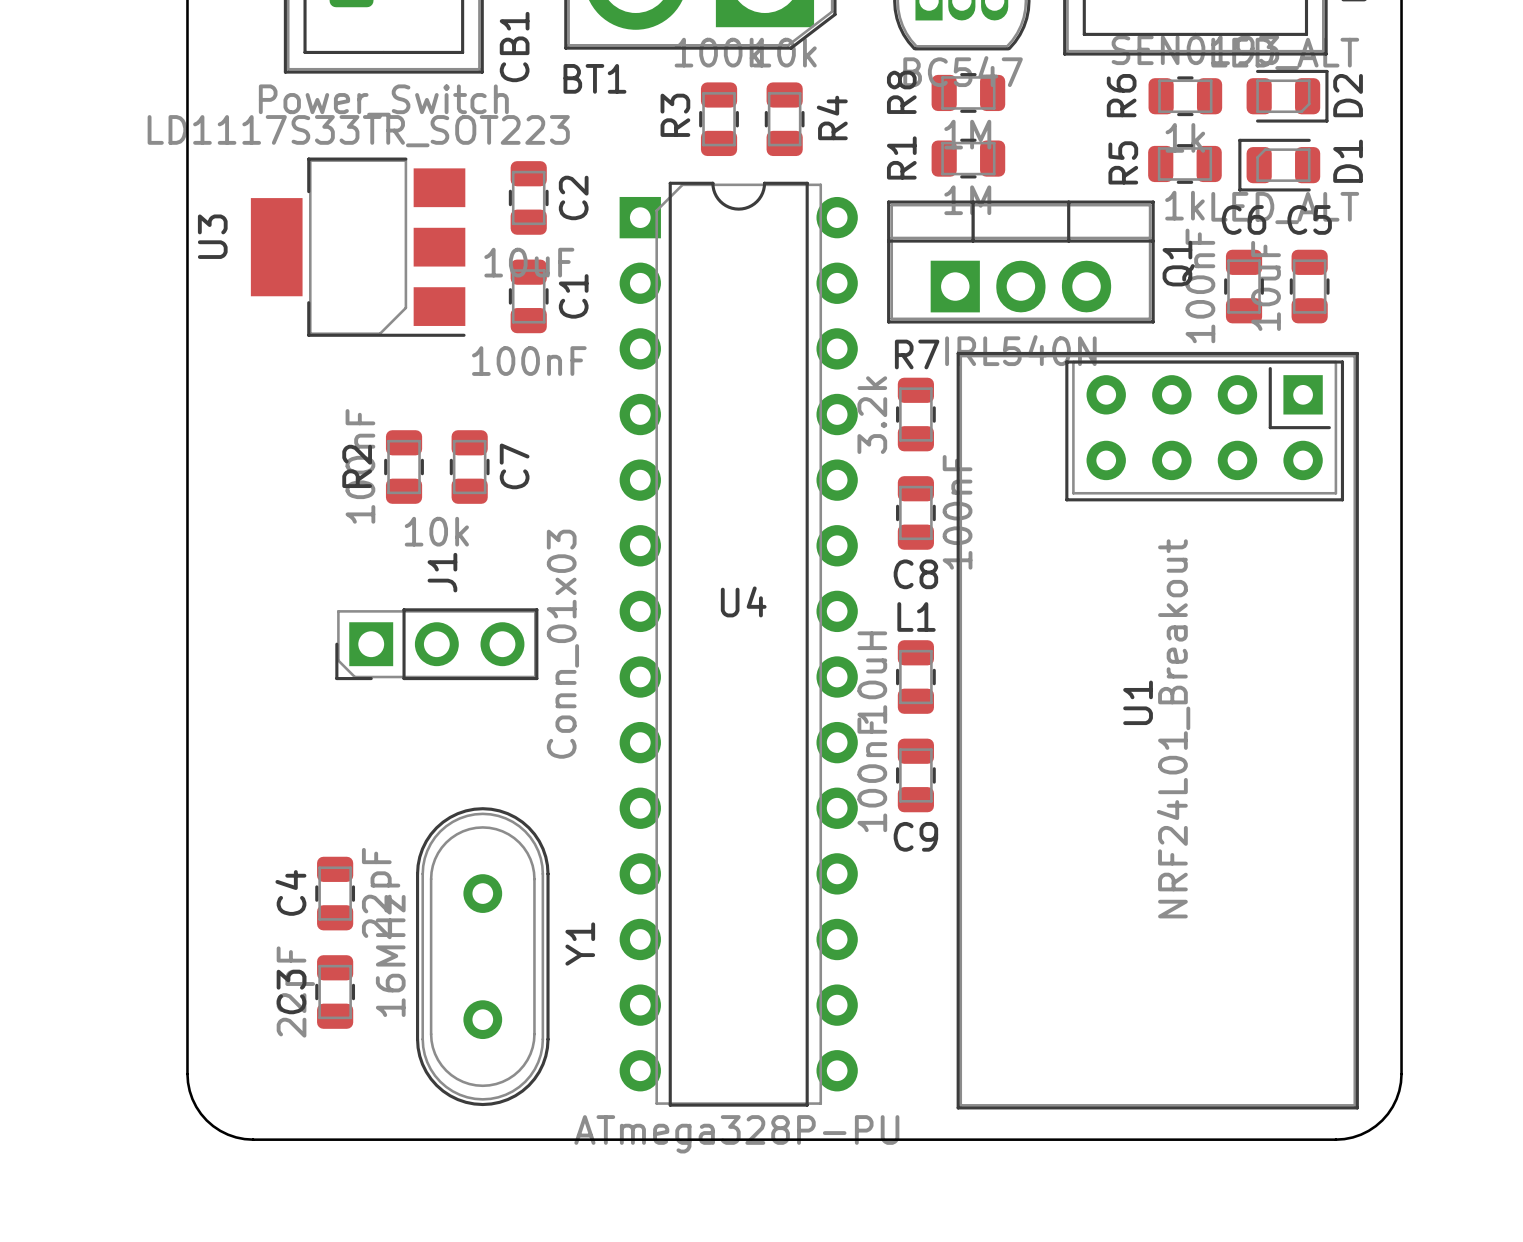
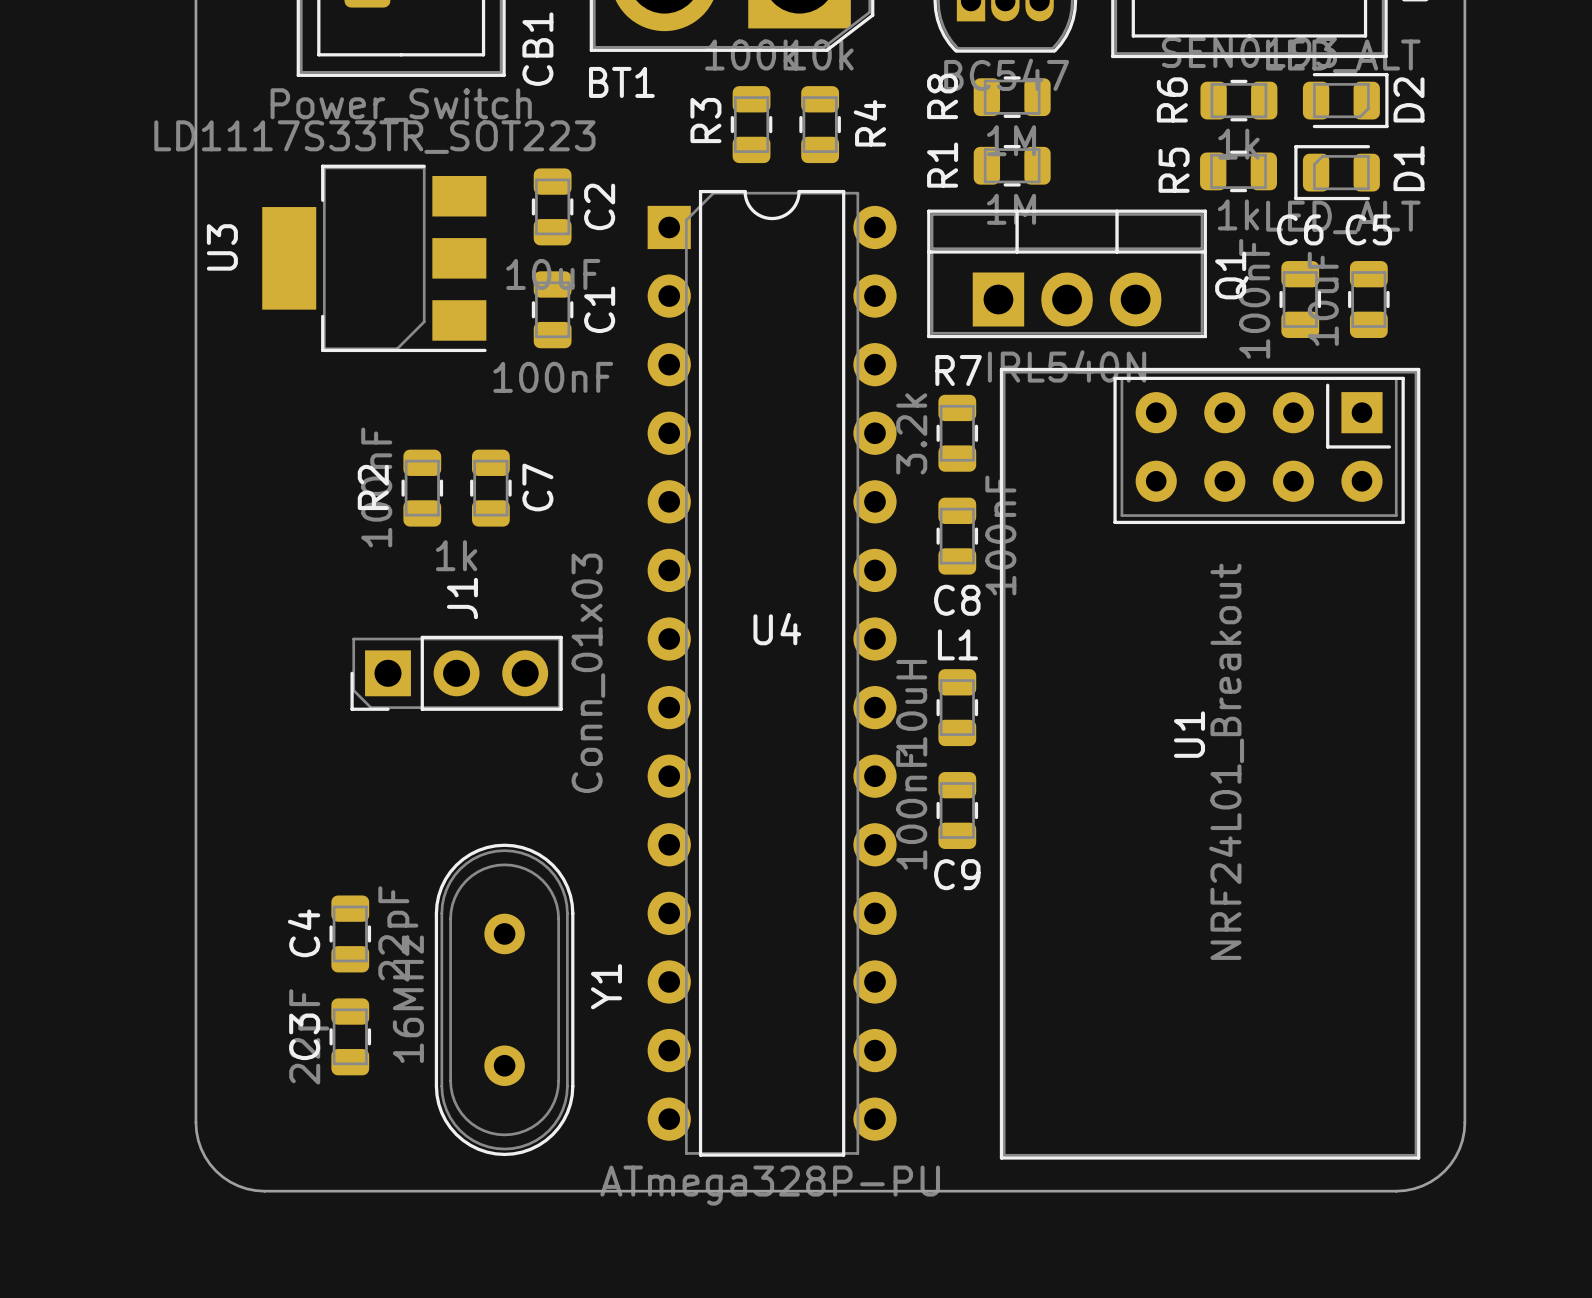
R2 value: 10k (436, 531) -> 1k (456, 555)

